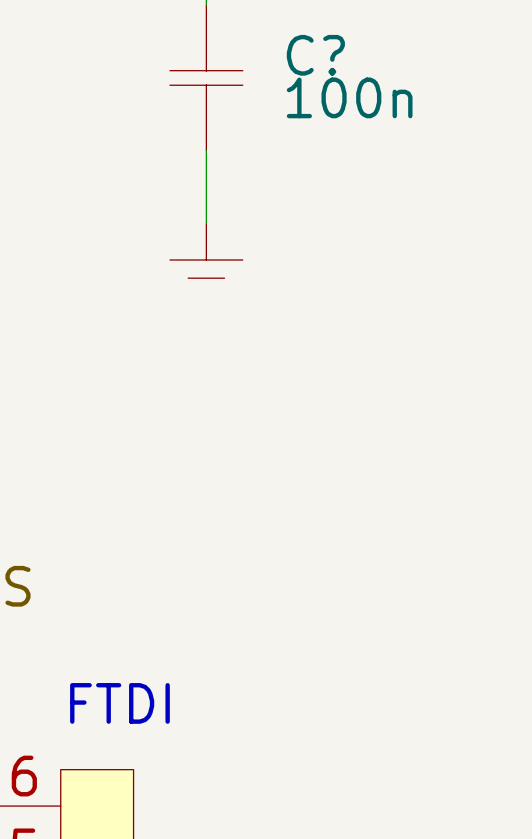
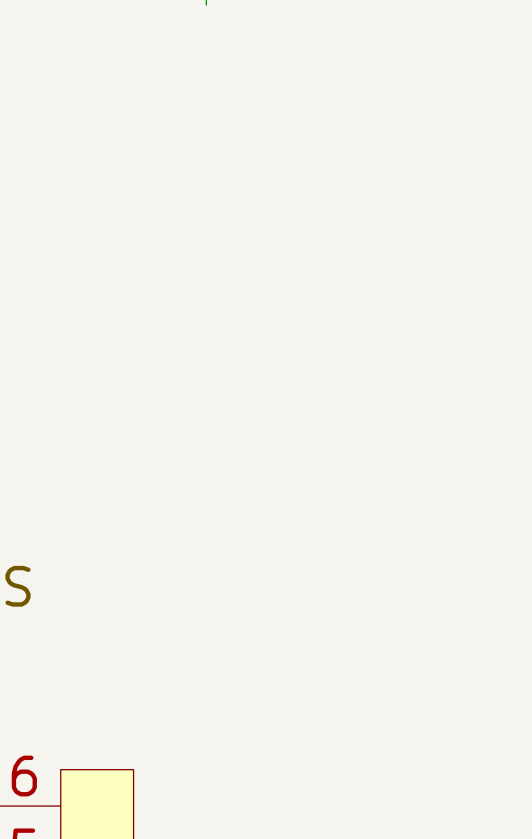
C?: 100n (206, 77) -> none
wire: (206, 150) (206, 223) -> none
power symbol: (206, 259) -> none
text: FTDI (119, 703) -> none

